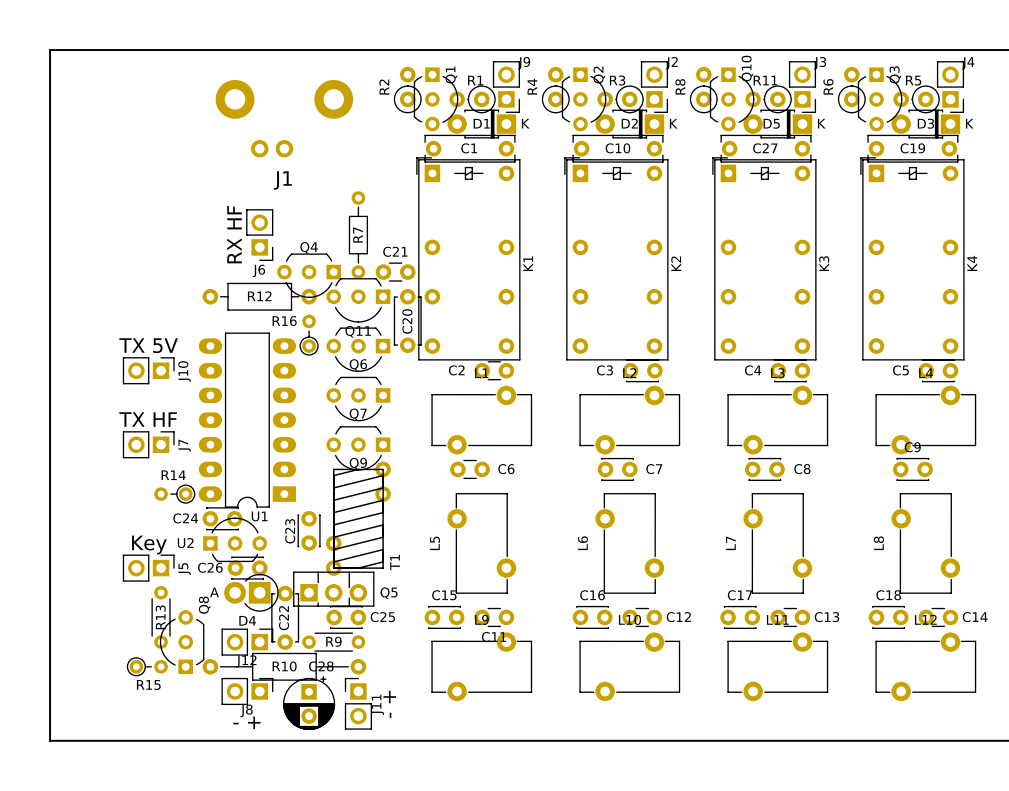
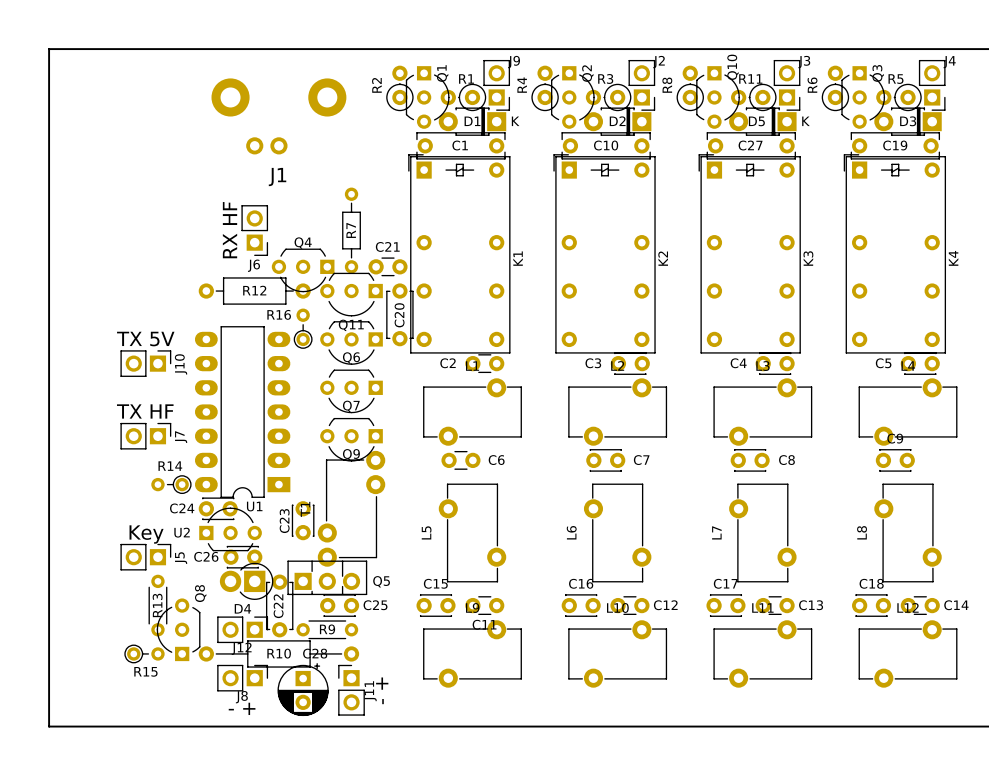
D2 text: K (673, 123) -> none
D3 text: K (969, 123) -> none
T1 footprint: [325, 461, 391, 576] -> [317, 450, 386, 567]
T1 name position: T1 (395, 562) -> T1 (305, 509)
D4 text: A (214, 592) -> none

